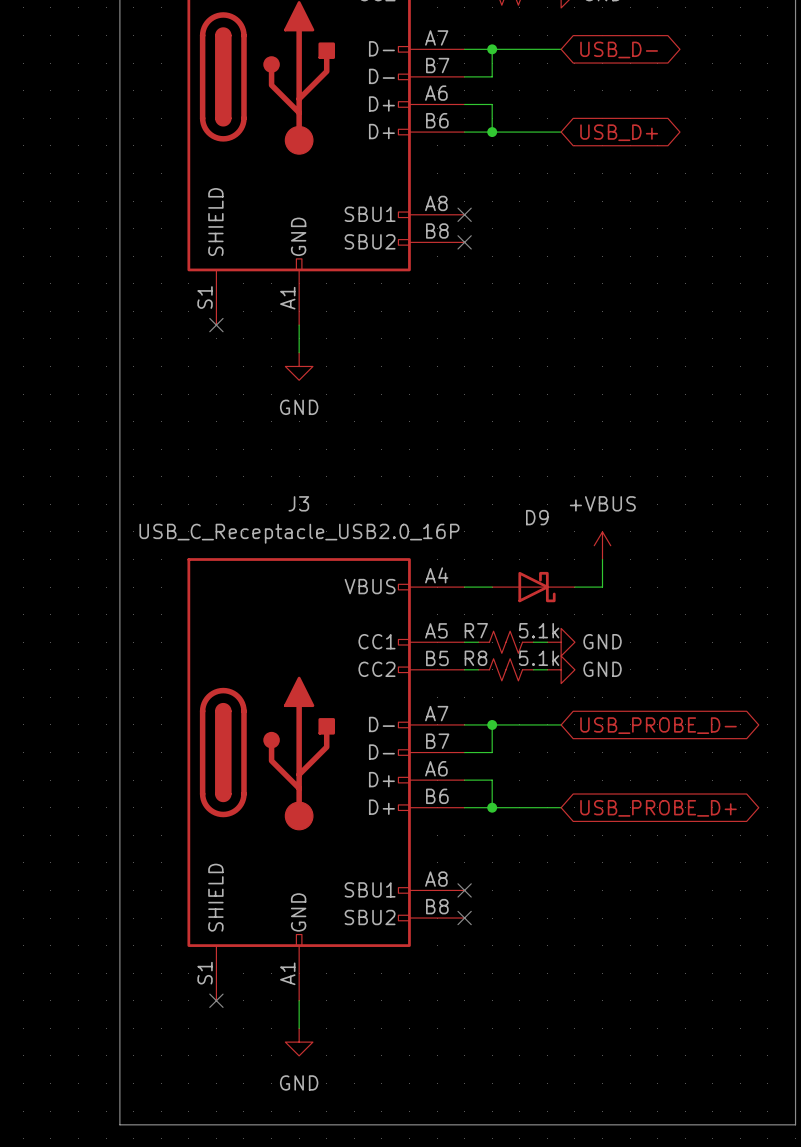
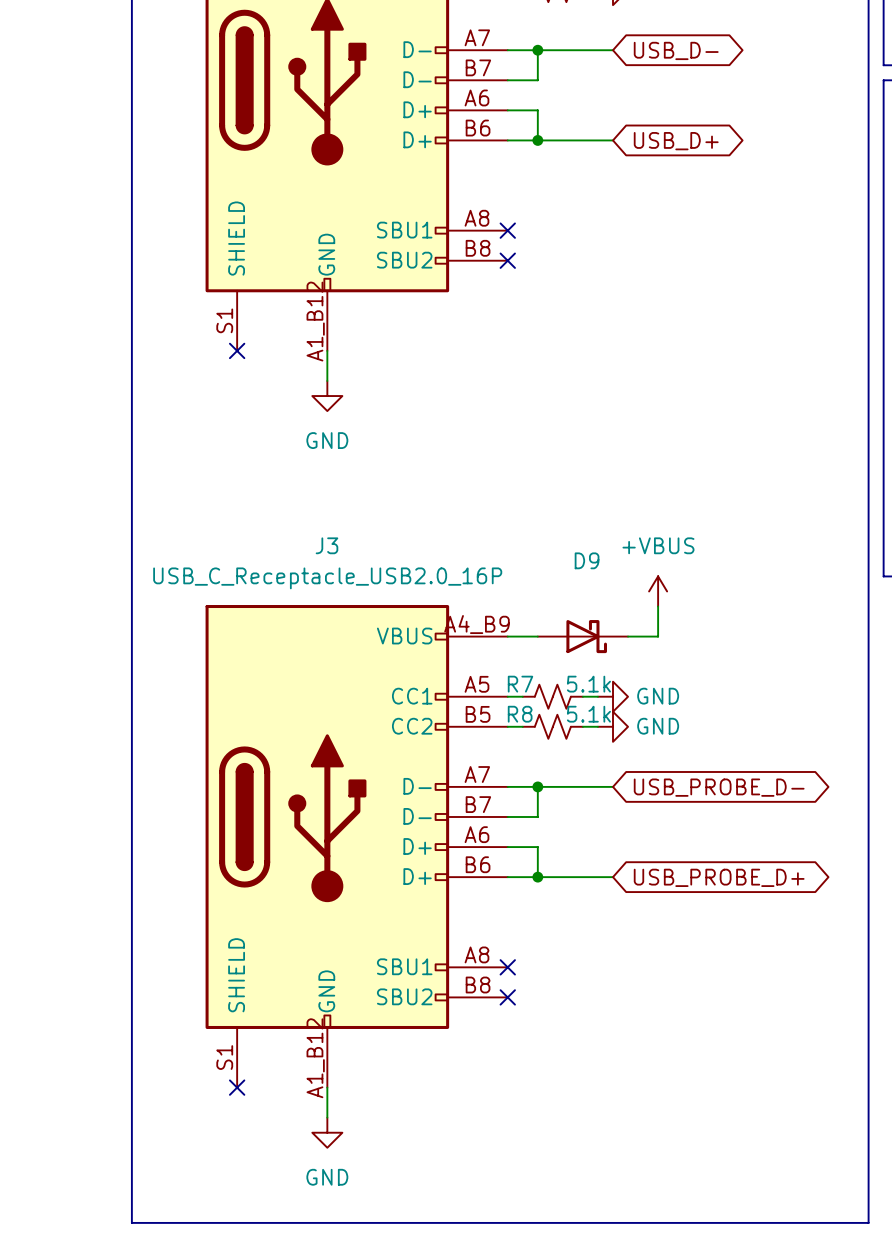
part pin number: A1 (287, 298) -> A1_B12 (315, 321)
J3 pin number: A4 (436, 575) -> A4_B9 (476, 624)
J3 pin number: A1 (287, 973) -> A1_B12 (315, 1058)

